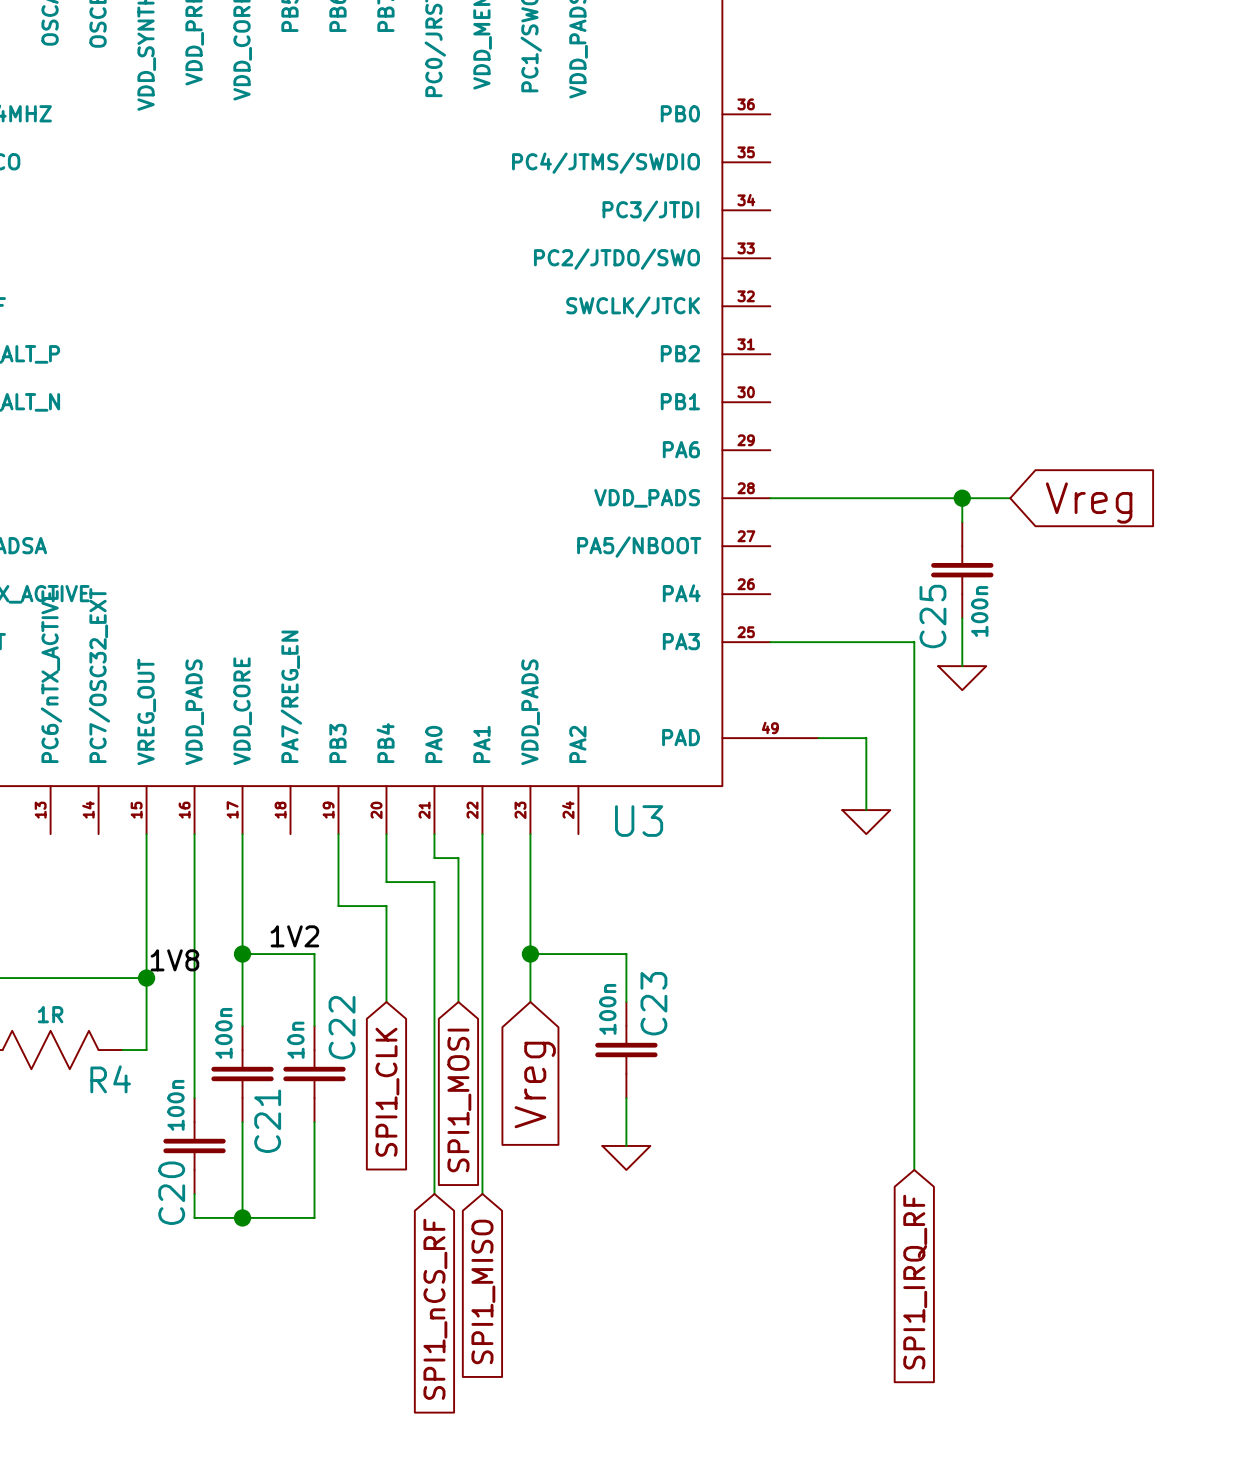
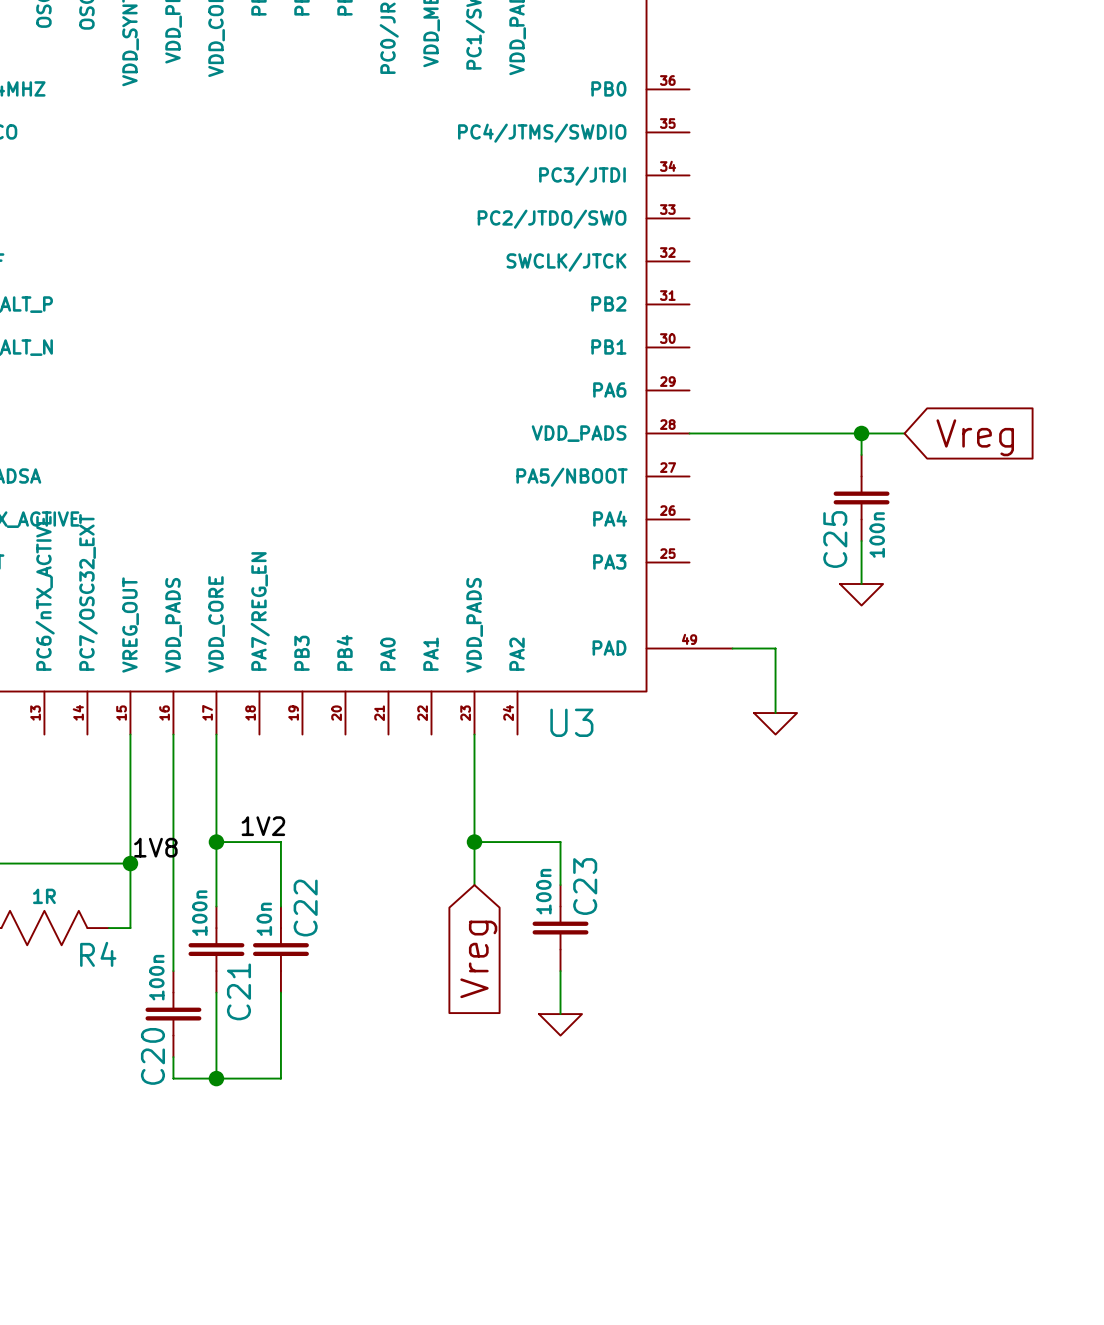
wire: (770, 642) (914, 642) (914, 1169) -> none
wire: (338, 834) (338, 906) (386, 906) (386, 1002) -> none
wire: (386, 834) (386, 882) (434, 882) (434, 1193) -> none
wire: (434, 834) (434, 858) (458, 858) (458, 1002) -> none
wire: (482, 834) (482, 1193) -> none
global label: SPI1_CLK (387, 1092) -> none
global label: SPI1_MOSI (459, 1100) -> none
global label: SPI1_IRQ_RF (915, 1282) -> none
global label: SPI1_MISO (483, 1291) -> none
global label: SPI1_nCS_RF (435, 1309) -> none

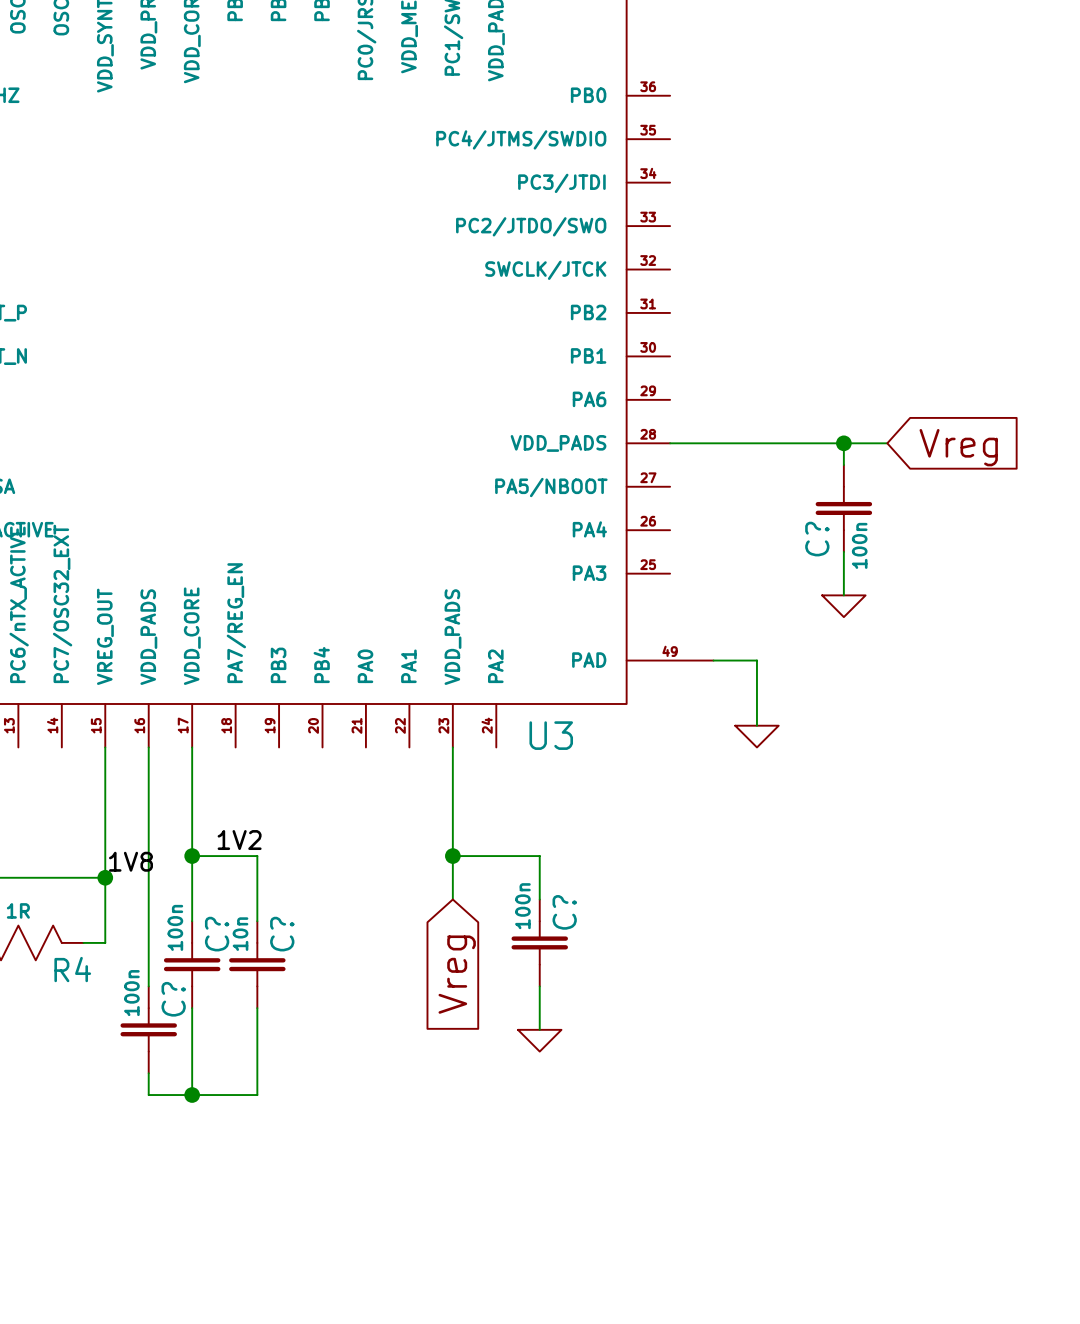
C25 name: C25 (835, 539) -> C? (817, 539)
C23 name: C23 (585, 886) -> C? (564, 912)
C22 name: C22 (305, 908) -> C? (282, 934)
C21 name: C21 (238, 991) -> C? (217, 934)
C20 name: C20 (152, 1056) -> C? (173, 999)

